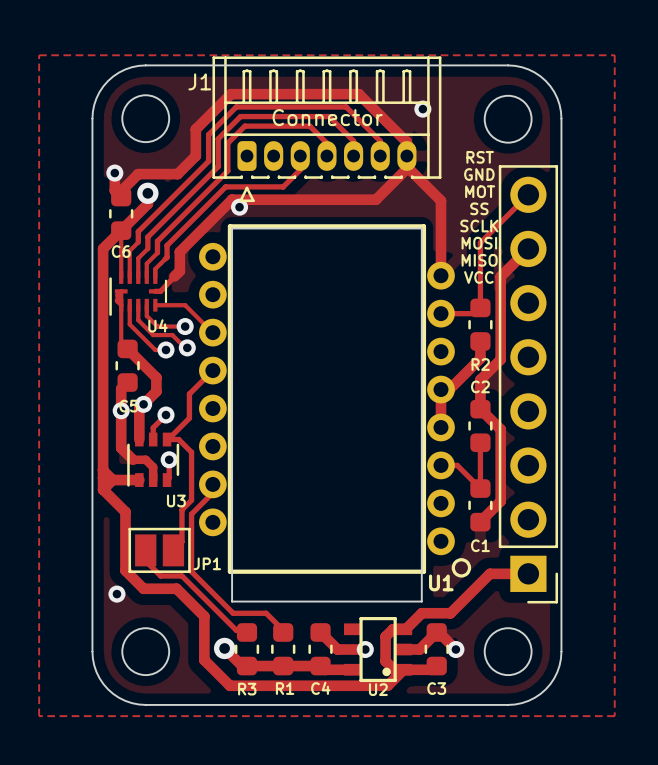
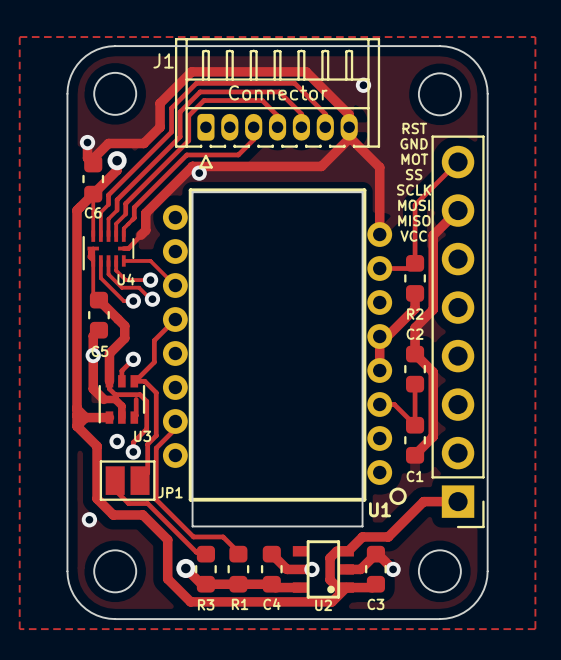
via: (143, 404) -> none
track: none -> (109, 381) (109, 388) (115, 394) (140, 394) (146, 401) (146, 429) (133, 442) (133, 451)
via: (169, 459) -> none
via: none -> (117, 441)
via: none -> (133, 451)

